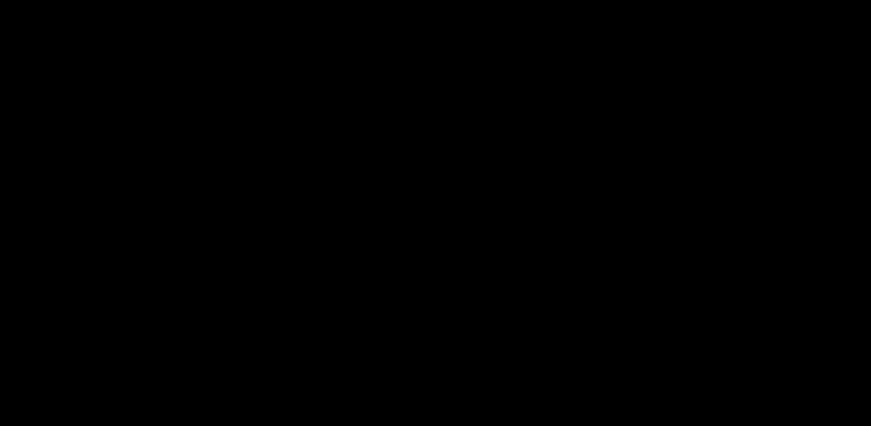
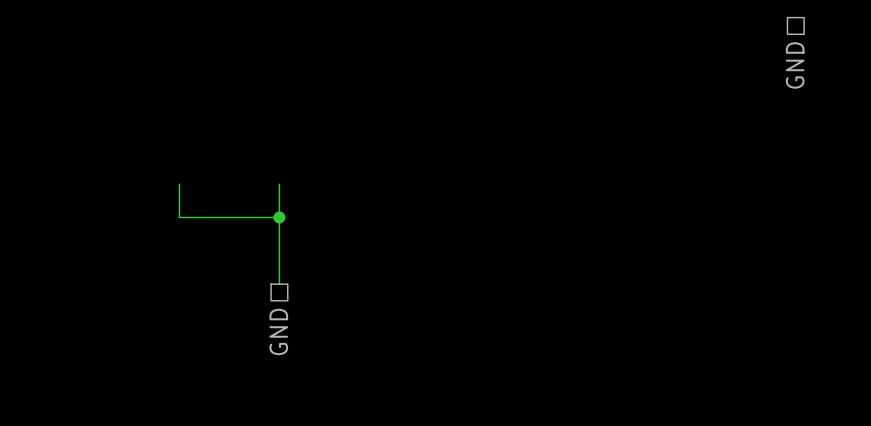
hierarchical label: none -> GND (795, 65)
wire: none -> (179, 184) (179, 217) (279, 217)
wire: none -> (279, 184) (279, 284)
junction: none -> (279, 217)
hierarchical label: none -> GND (278, 331)

